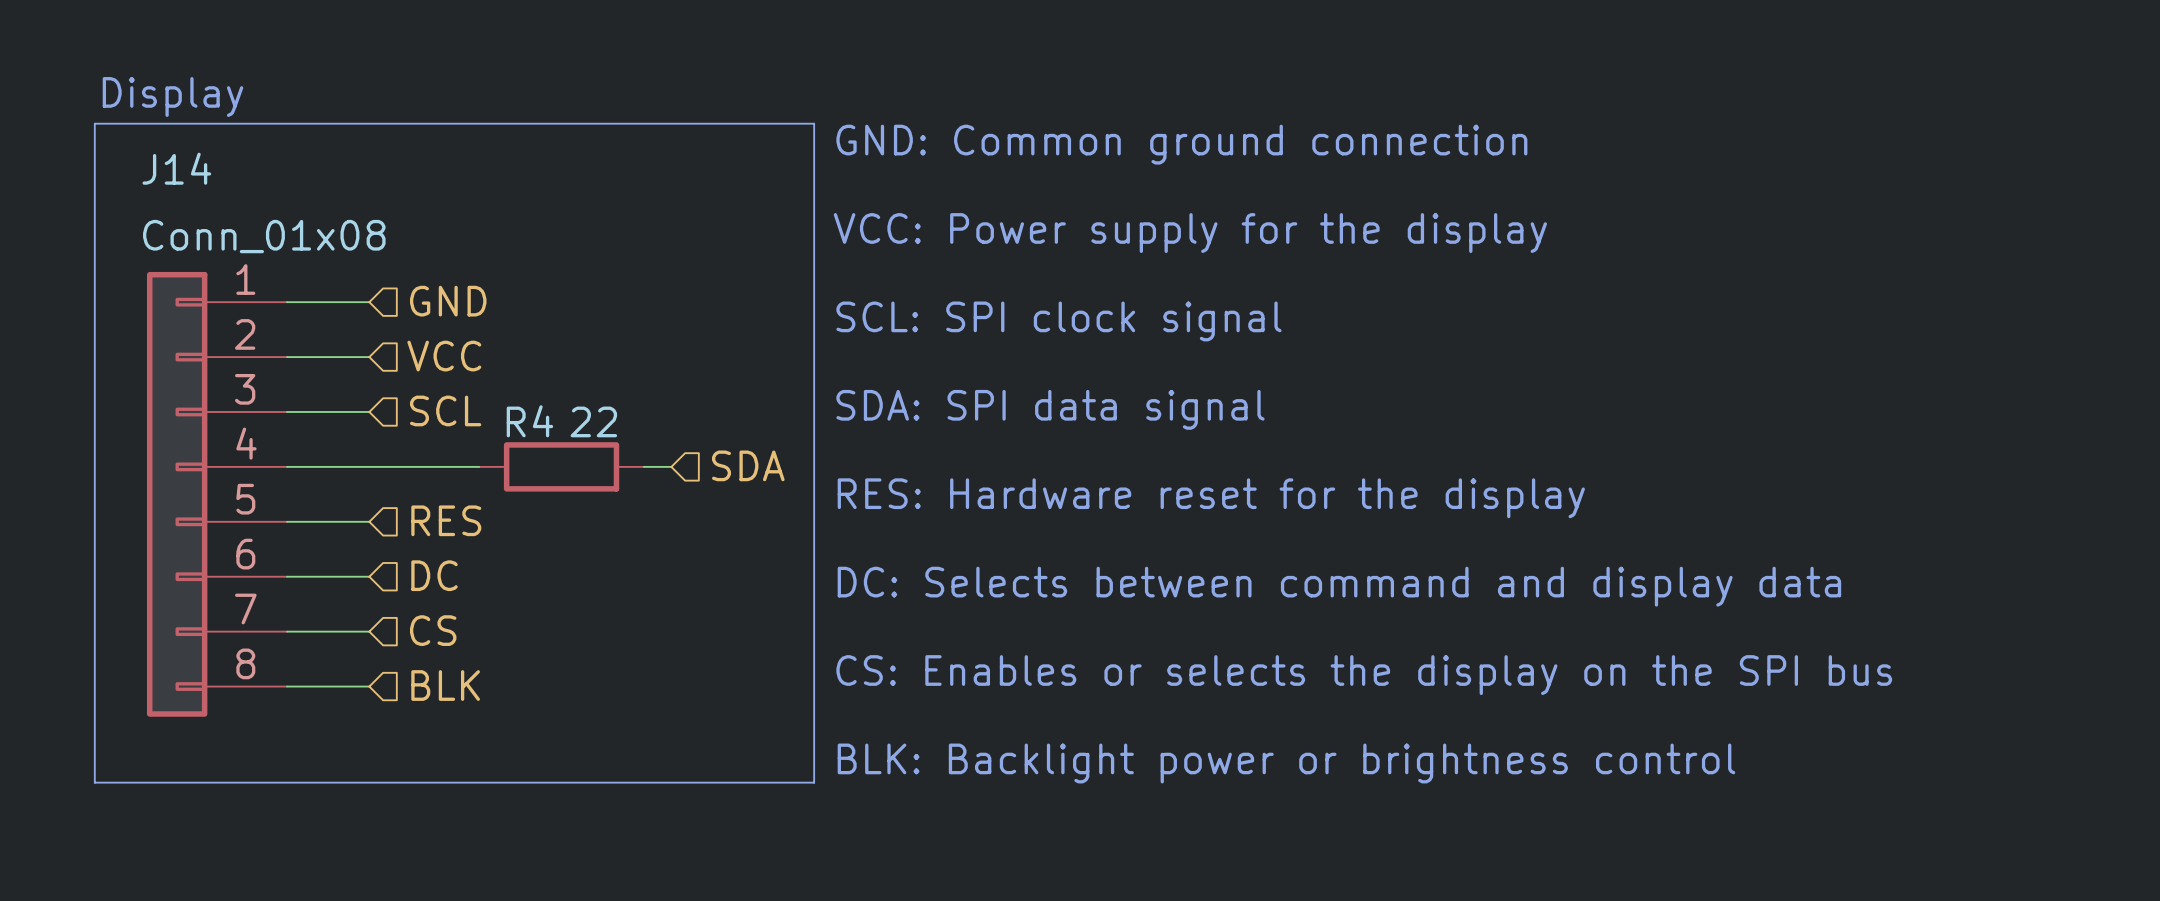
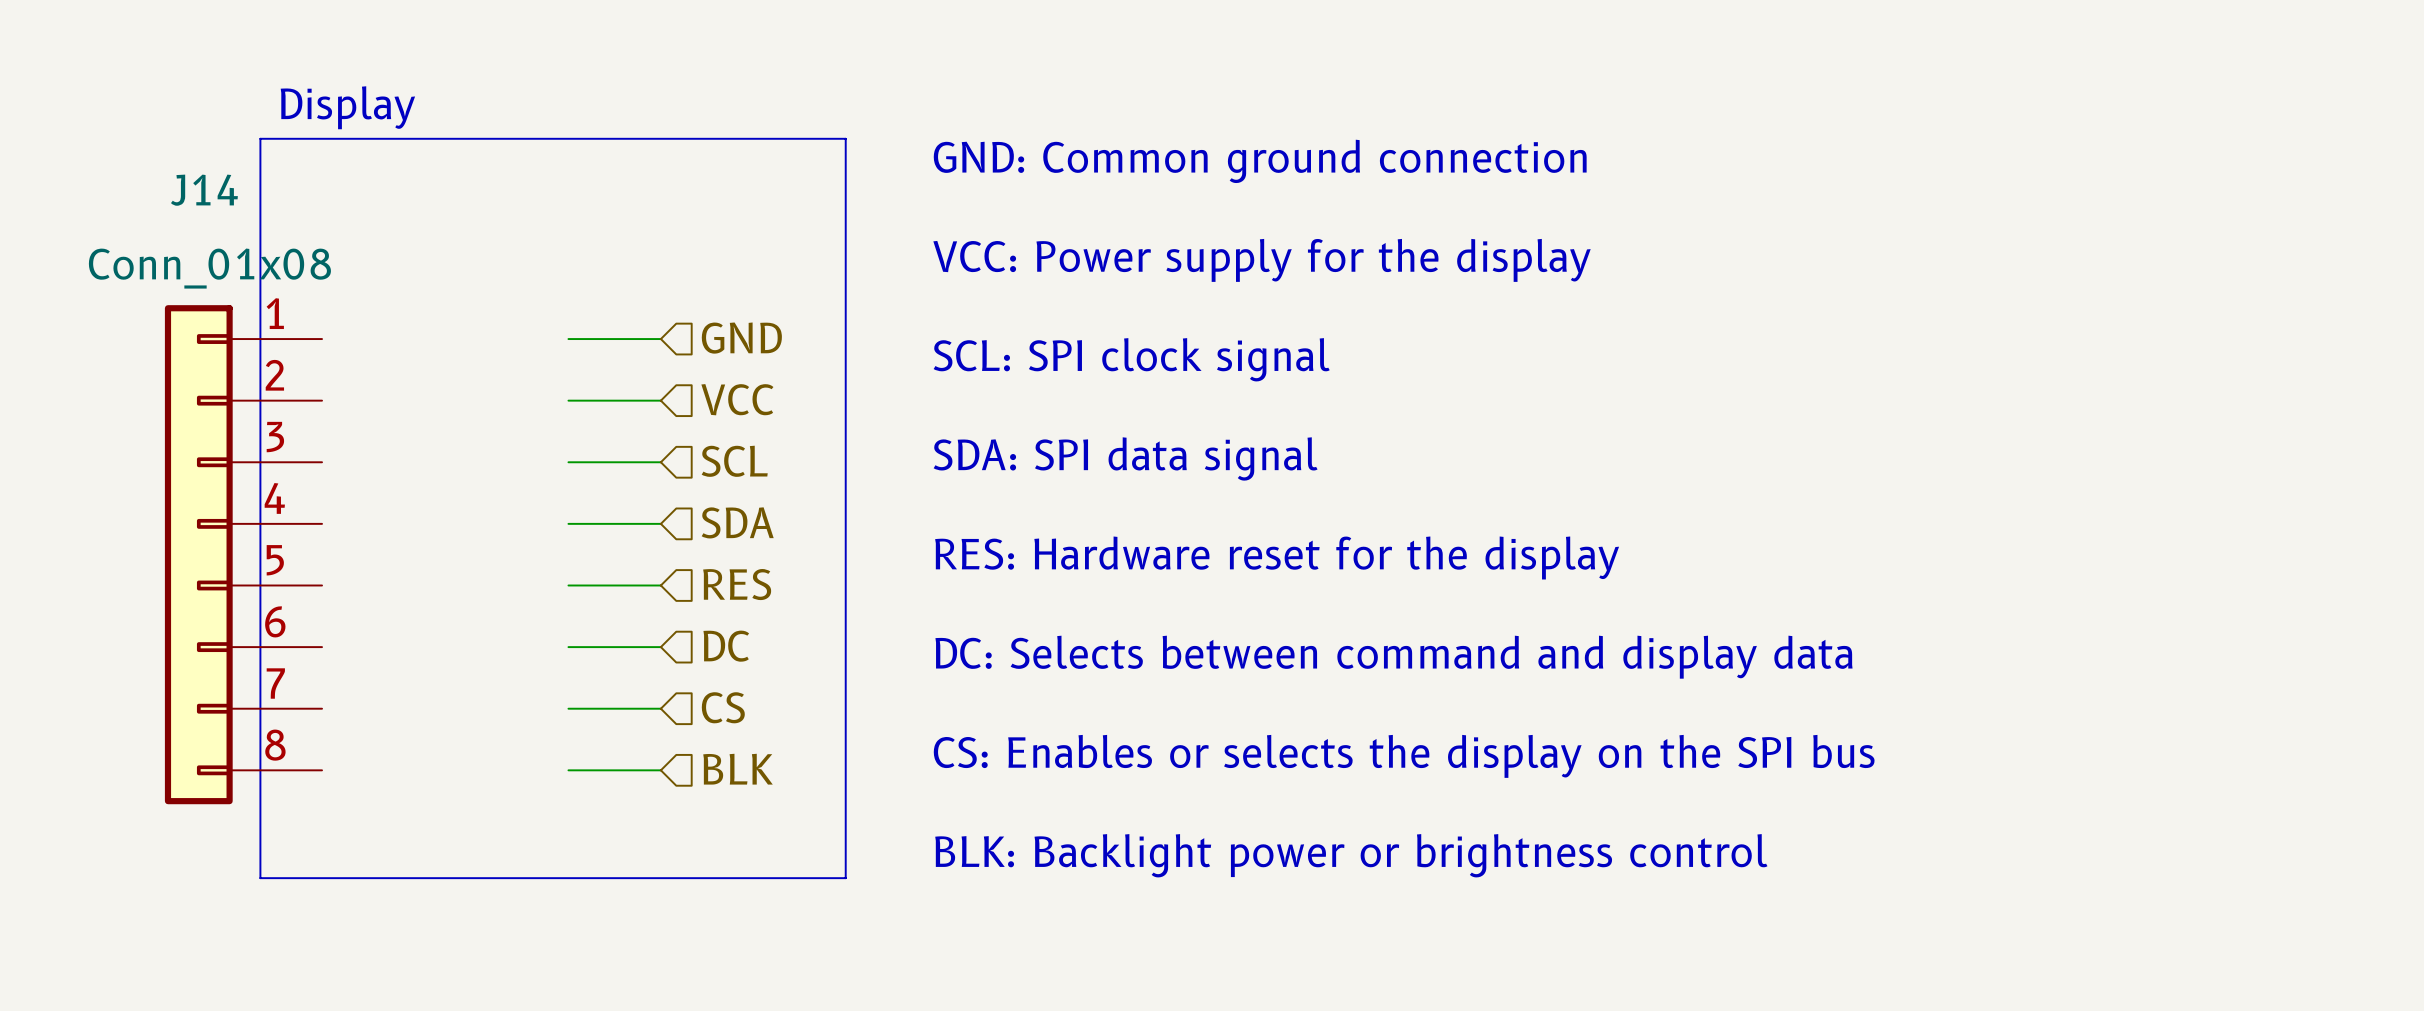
text position: Display (172, 97) -> Display (347, 107)
line: (232, 123) (94, 123) (94, 782) (232, 782) -> (260, 138) (260, 878)
line: (753, 123) (814, 123) (814, 782) (753, 782) -> (845, 138) (845, 878)
J14 value position: Conn_01x08 (264, 236) -> Conn_01x08 (209, 268)
hierarchical label position: GND (448, 301) -> GND (741, 338)
wire: (287, 302) (369, 302) -> (568, 339) (660, 339)
hierarchical label position: VCC (444, 356) -> VCC (737, 399)
wire: (287, 357) (369, 357) -> (568, 400) (660, 400)
hierarchical label position: SCL (445, 410) -> SCL (734, 461)
wire: (287, 411) (369, 411) -> (568, 462) (660, 462)
hierarchical label position: SDA (748, 465) -> SDA (737, 522)
wire: (287, 466) (479, 466) -> none
wire: none -> (568, 523) (660, 523)
R4: 22 (561, 466) -> none
wire: (643, 466) (671, 466) -> none
hierarchical label position: RES (446, 520) -> RES (737, 584)
wire: (287, 521) (369, 521) -> (568, 585) (660, 585)
hierarchical label position: DC (434, 575) -> DC (726, 646)
wire: (287, 576) (369, 576) -> (568, 647) (660, 647)
hierarchical label position: CS (433, 630) -> CS (723, 707)
wire: (287, 631) (369, 631) -> (568, 708) (660, 708)
hierarchical label position: BLK (445, 685) -> BLK (738, 769)
wire: (287, 686) (369, 686) -> (568, 770) (660, 770)

